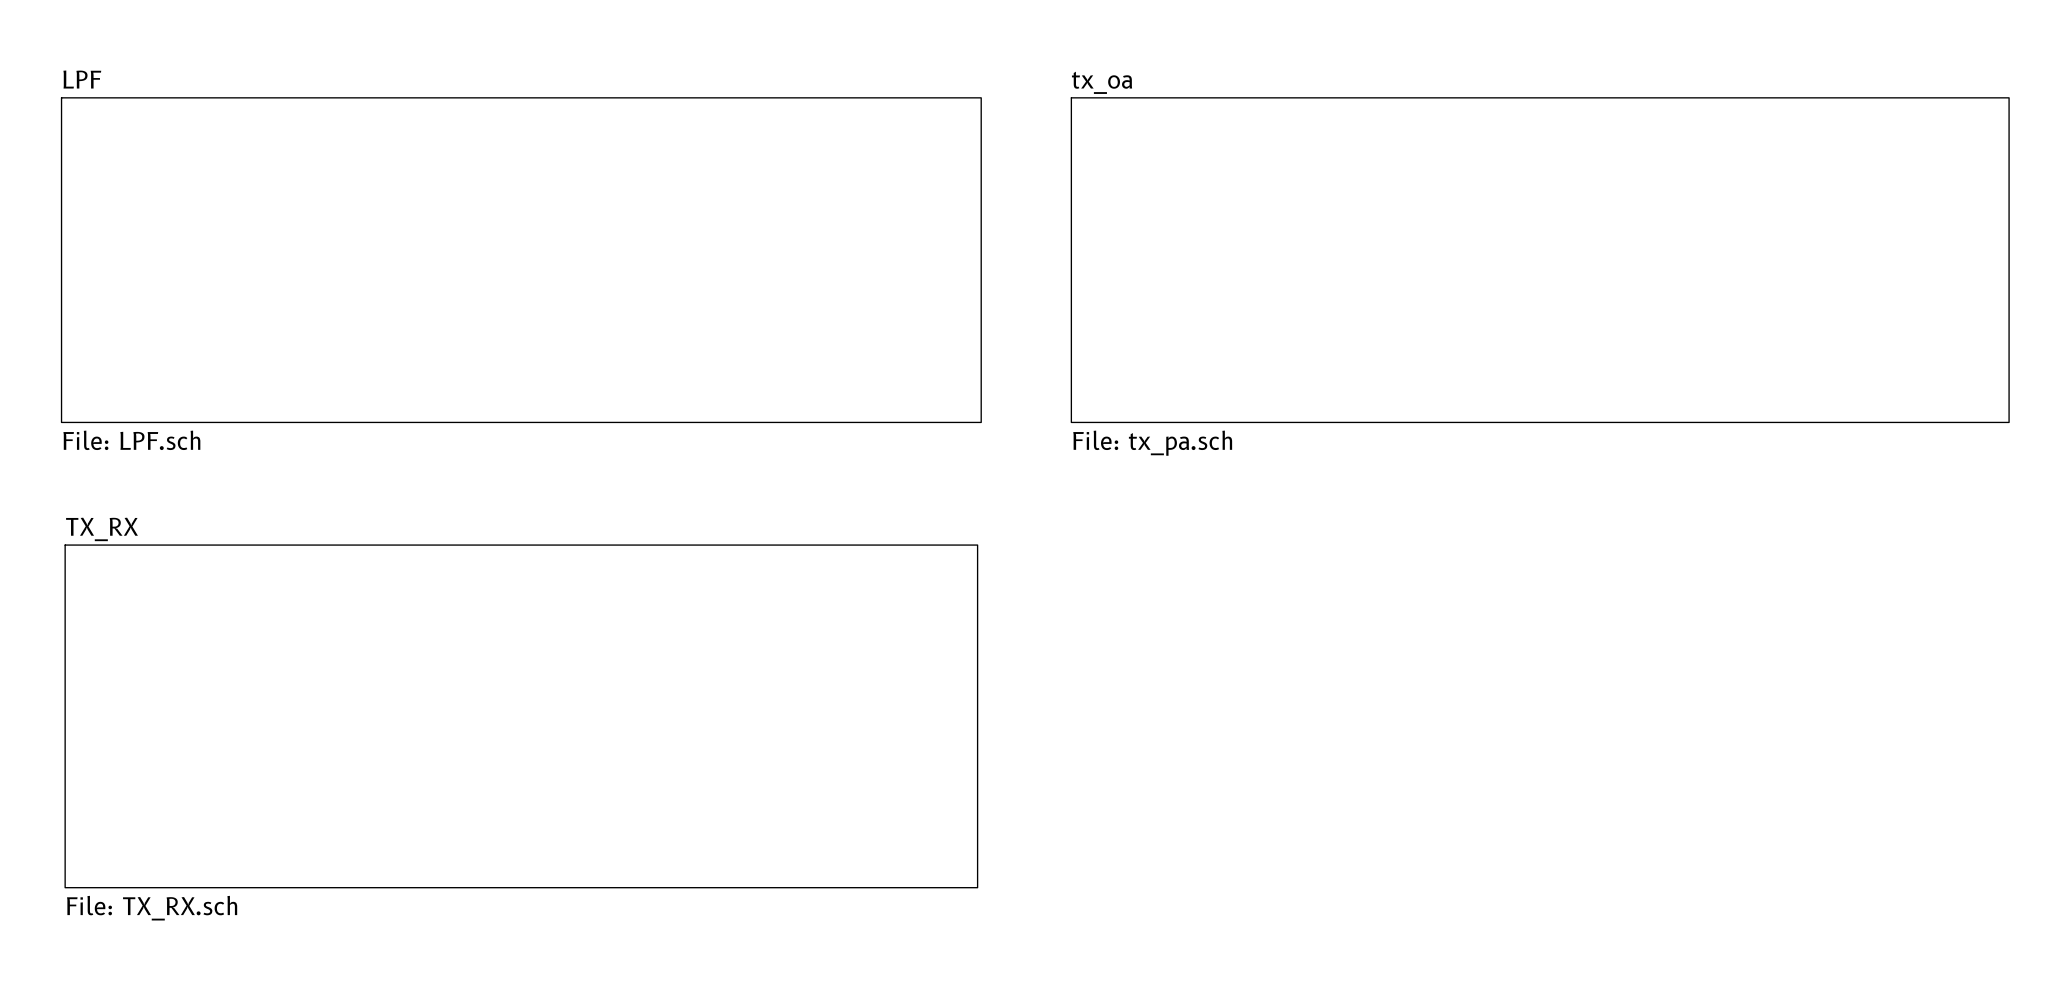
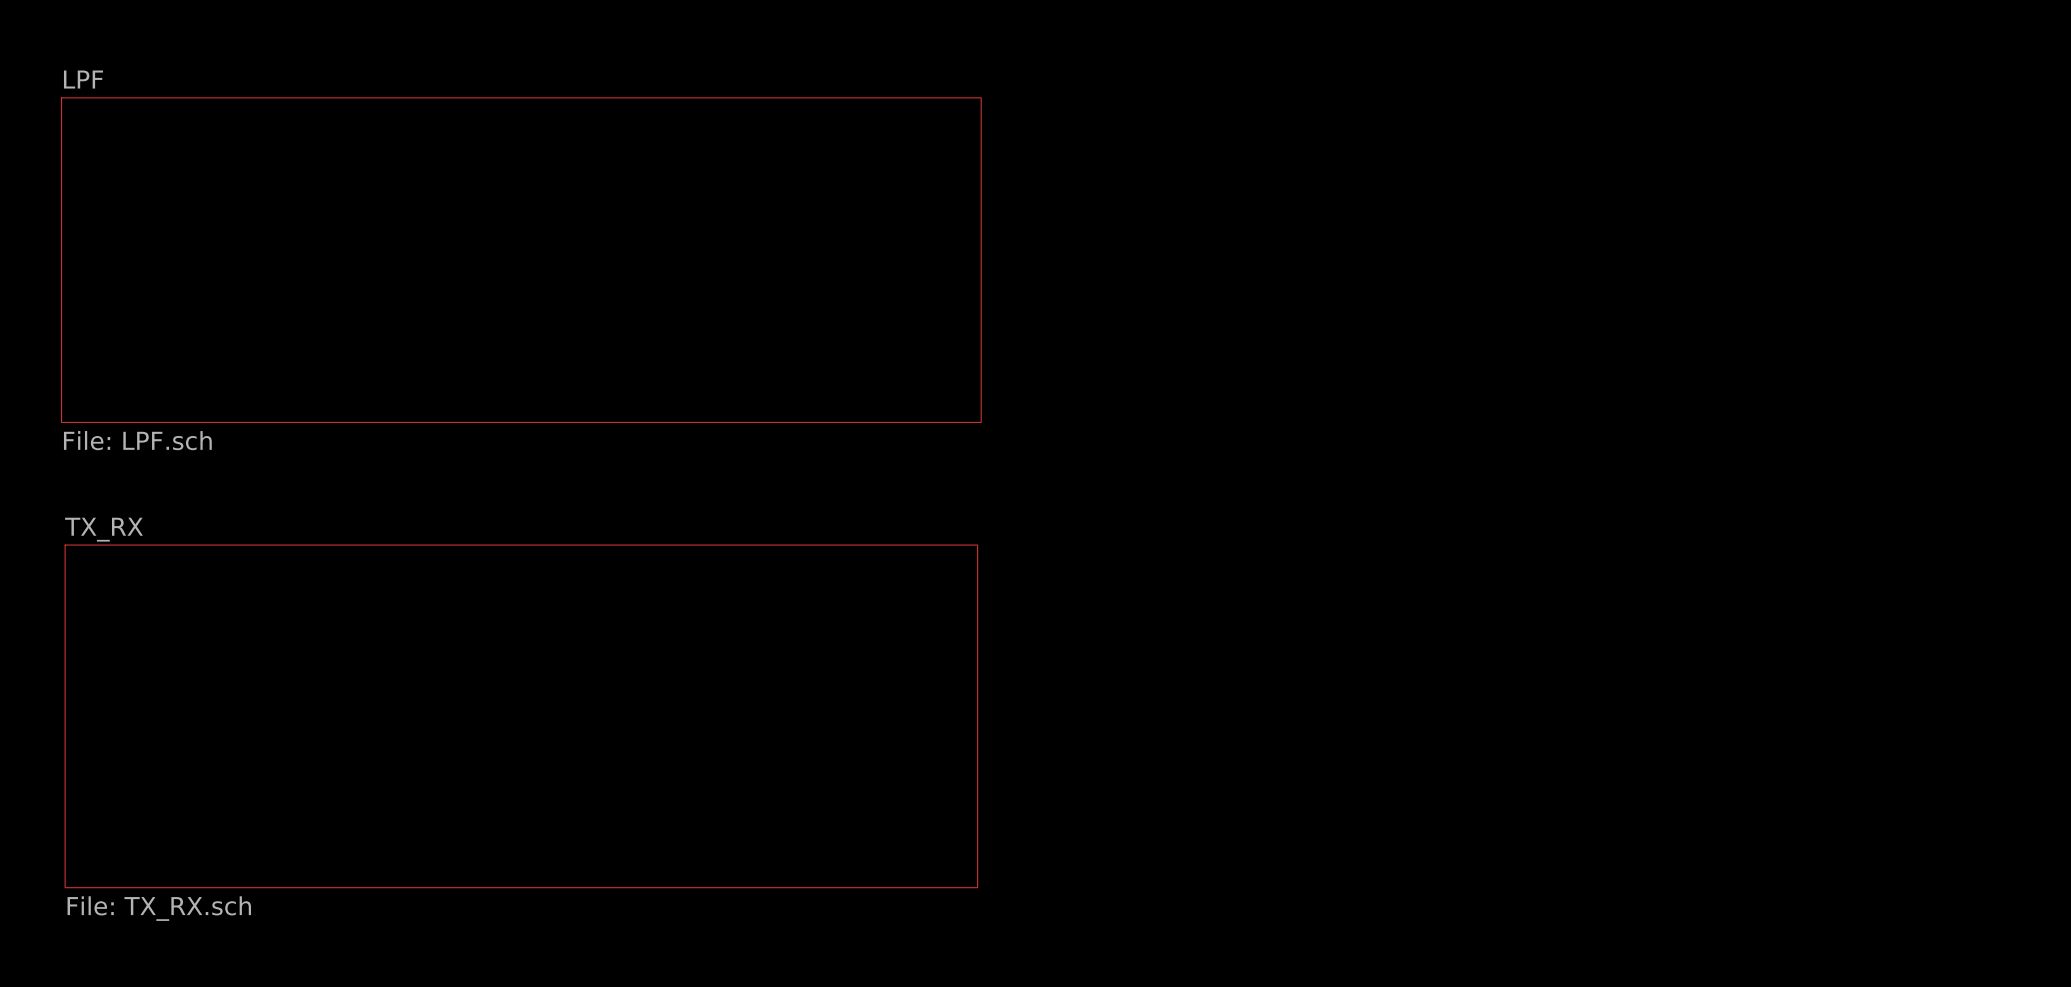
sheet tx_oa: File: tx_pa.sch (1540, 260) -> none

